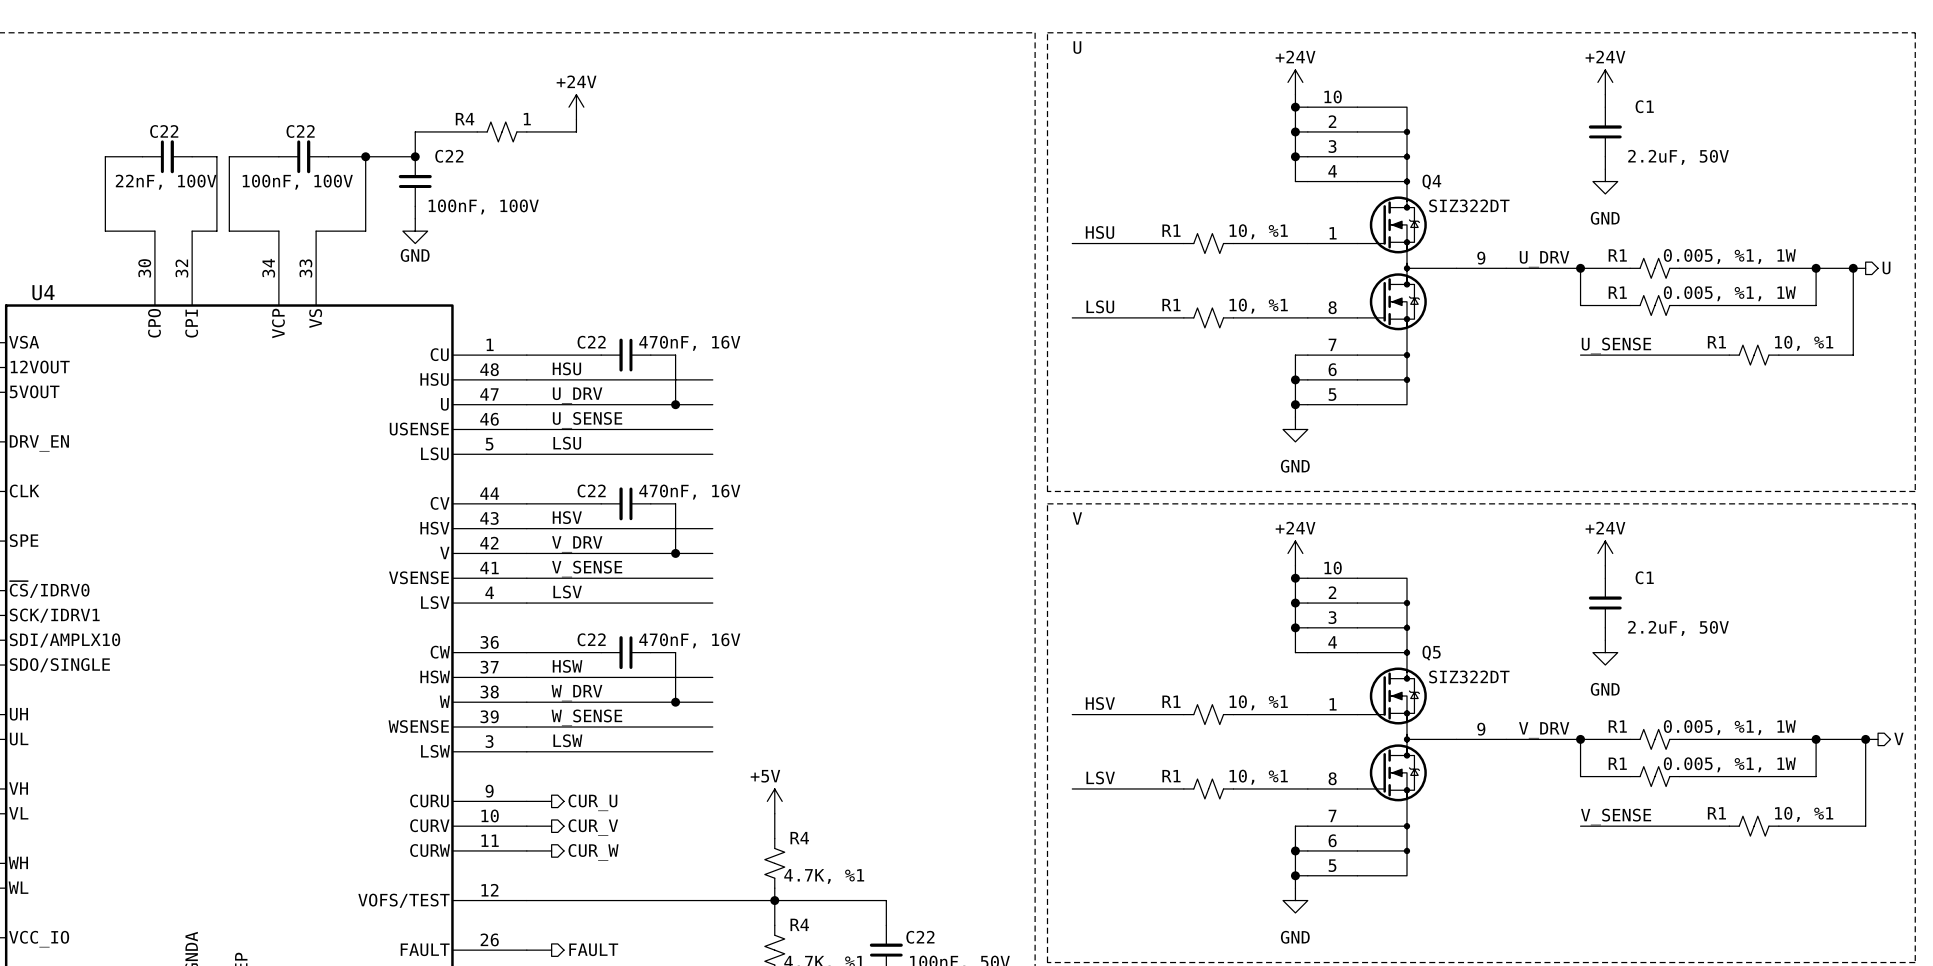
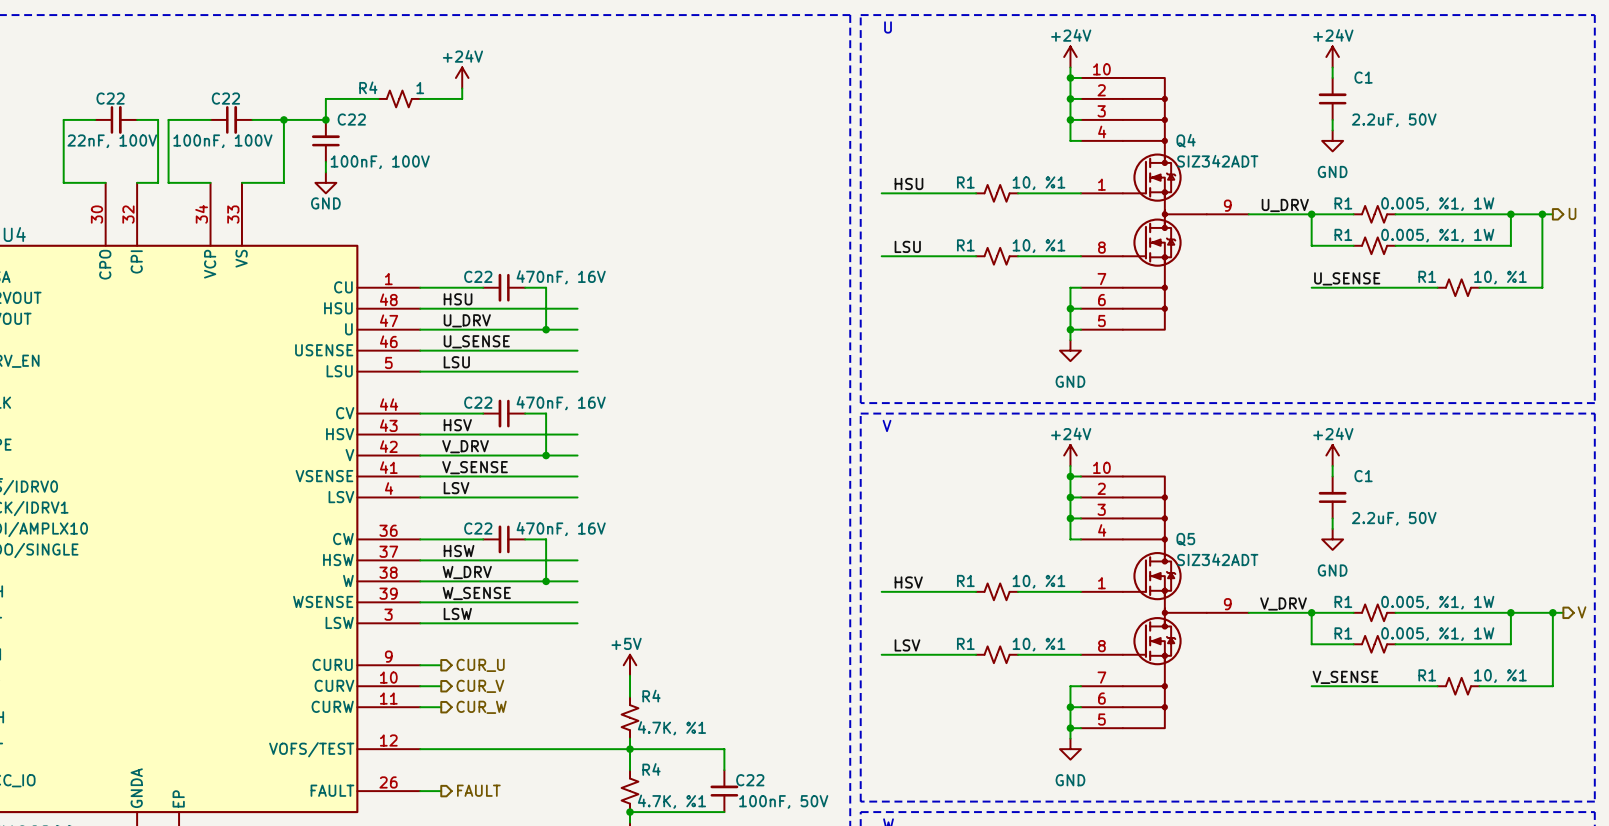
Q4 value: SIZ322DT (1469, 205) -> SIZ342ADT (1217, 161)
Q5 value: SIZ322DT (1469, 676) -> SIZ342ADT (1217, 559)

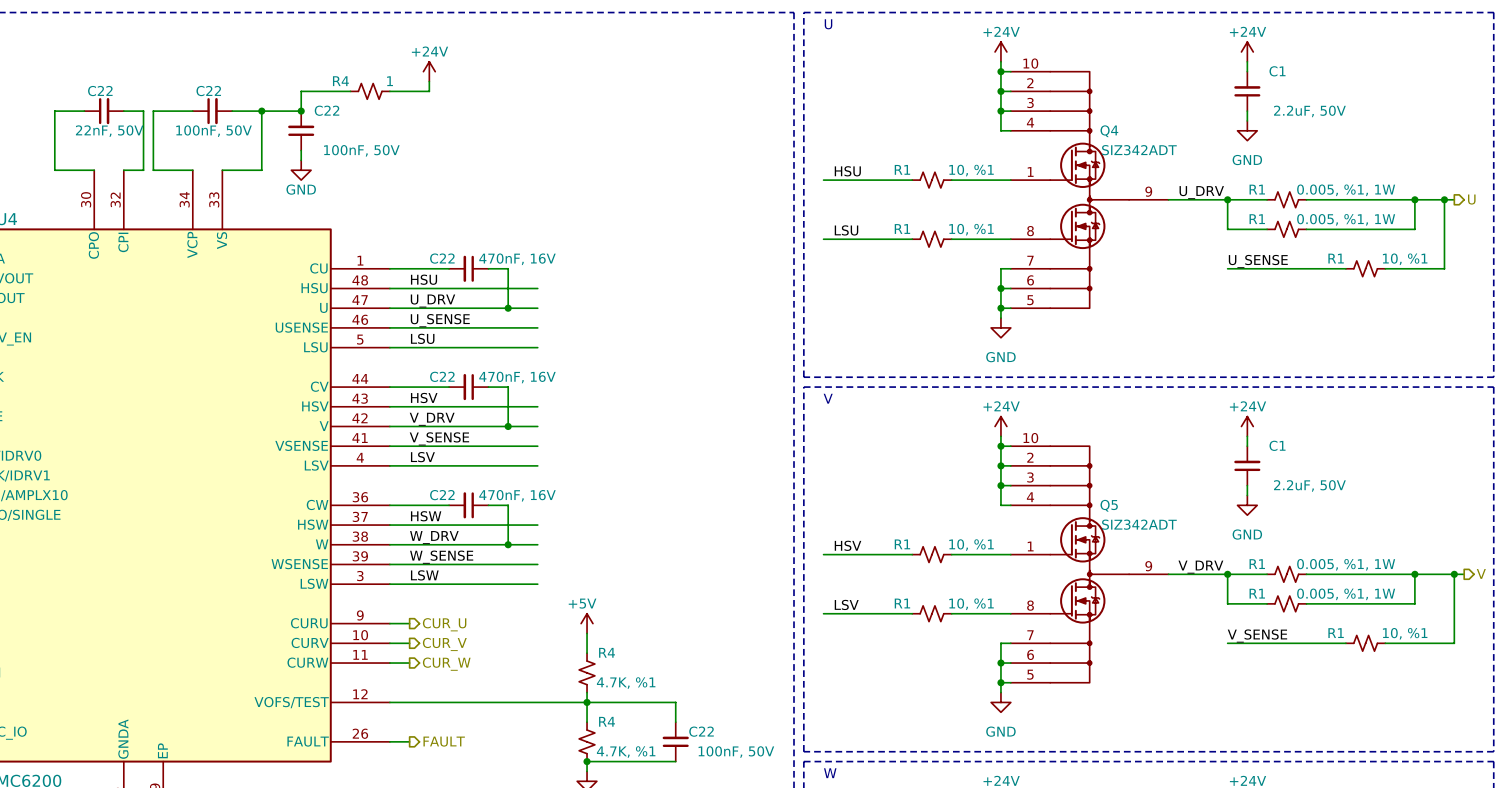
C22 value: 22nF, 100V (112, 141) -> 22nF, 50V (109, 131)
C22 value: 100nF, 100V (222, 141) -> 100nF, 50V (214, 131)
C22 value: 100nF, 100V (380, 162) -> 100nF, 50V (361, 150)

